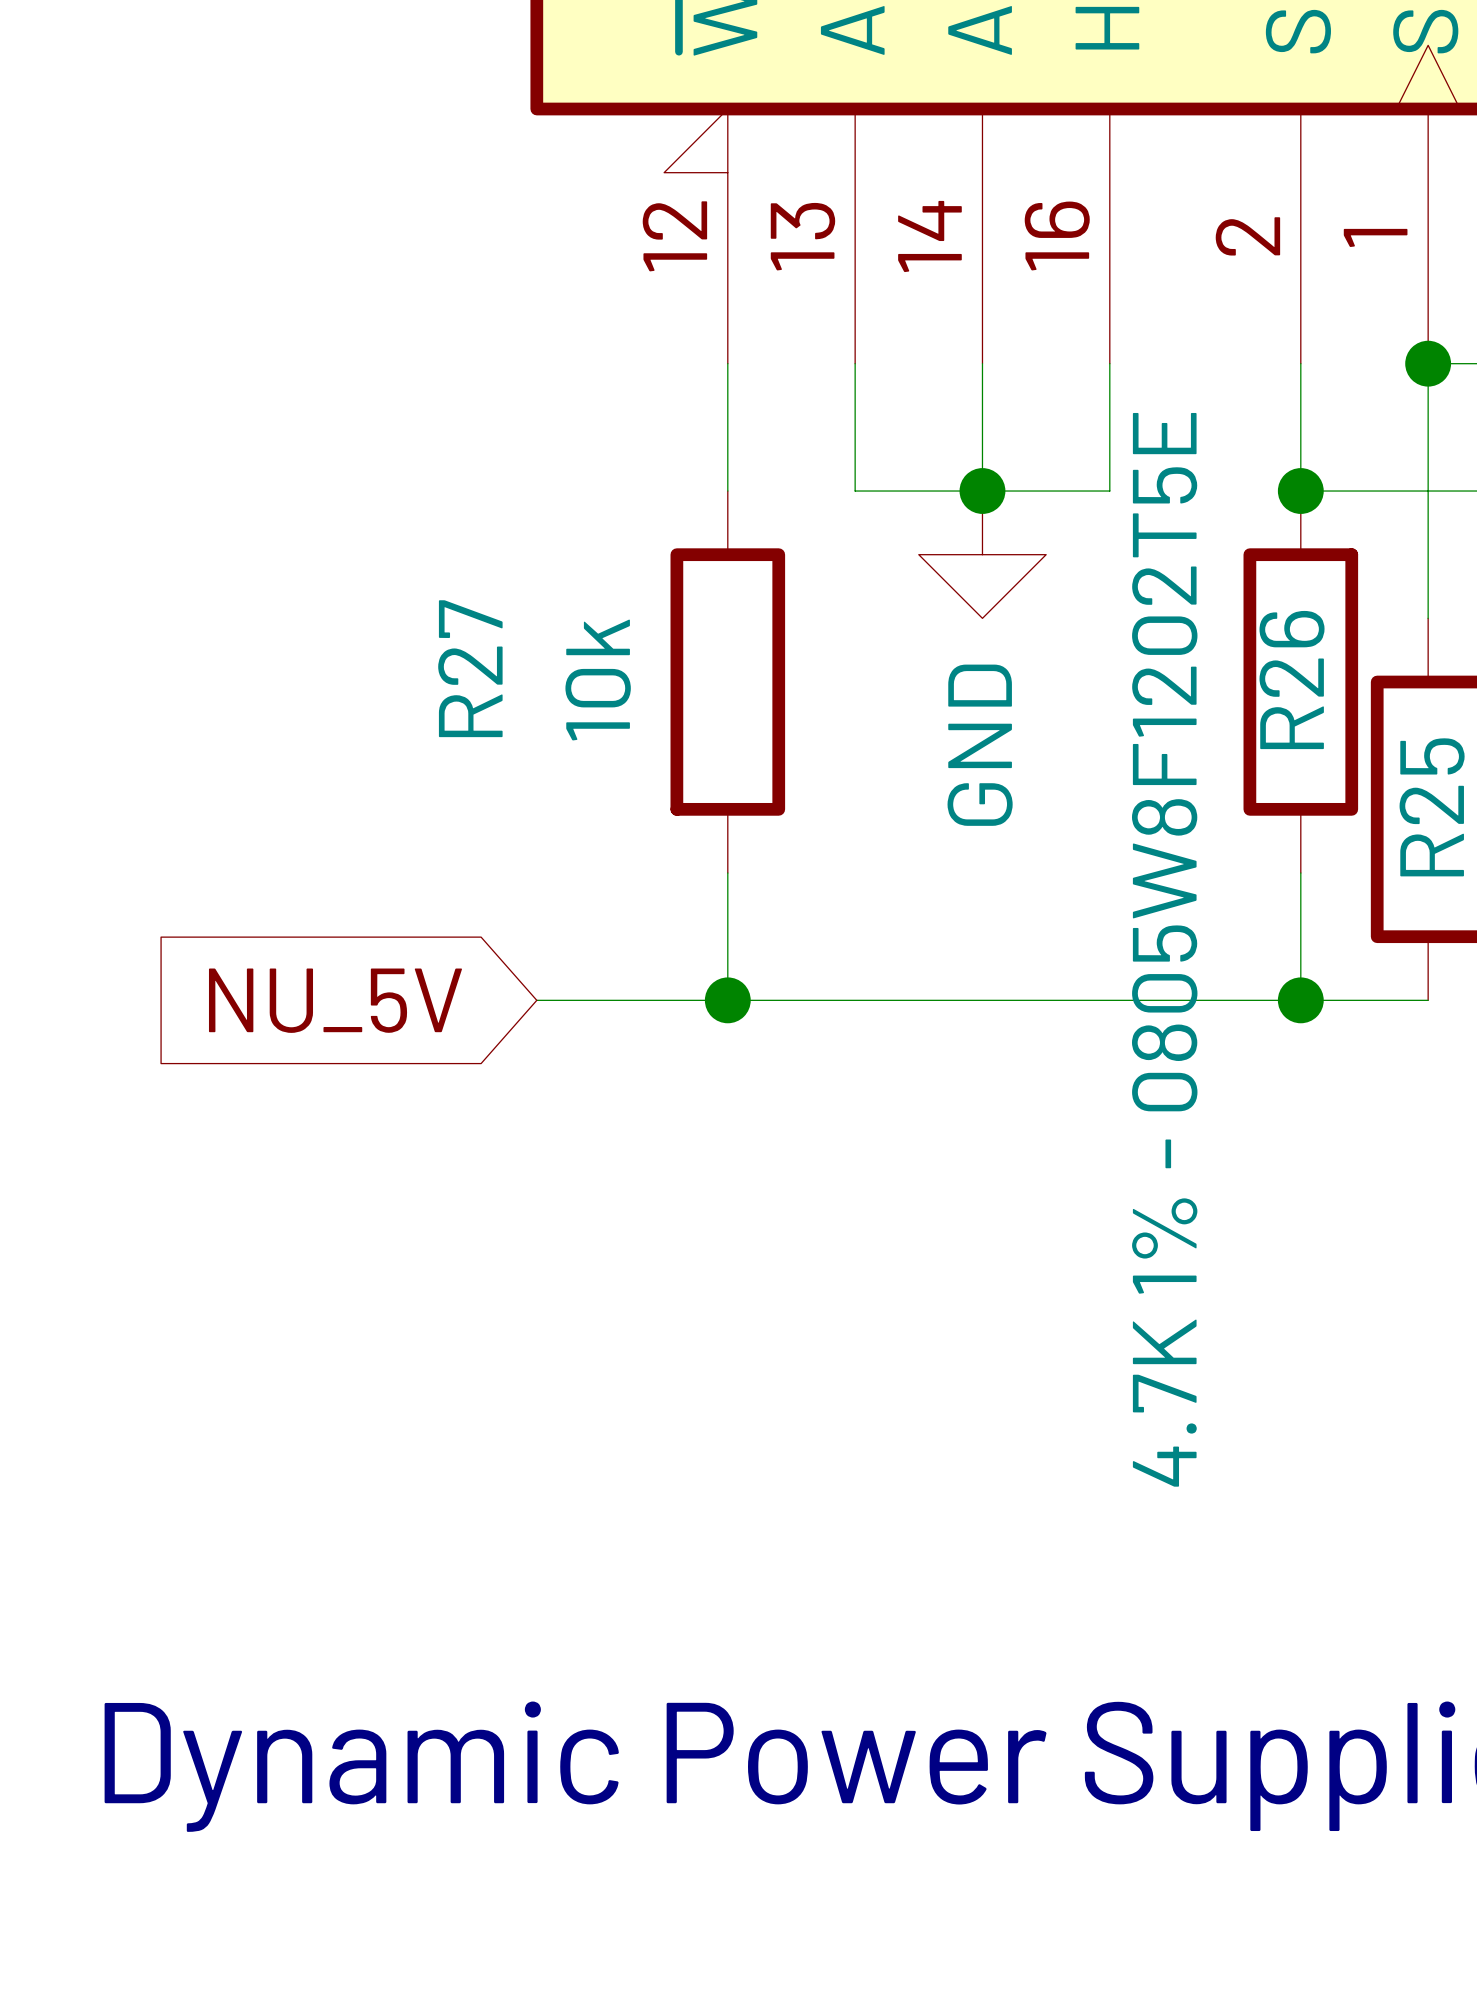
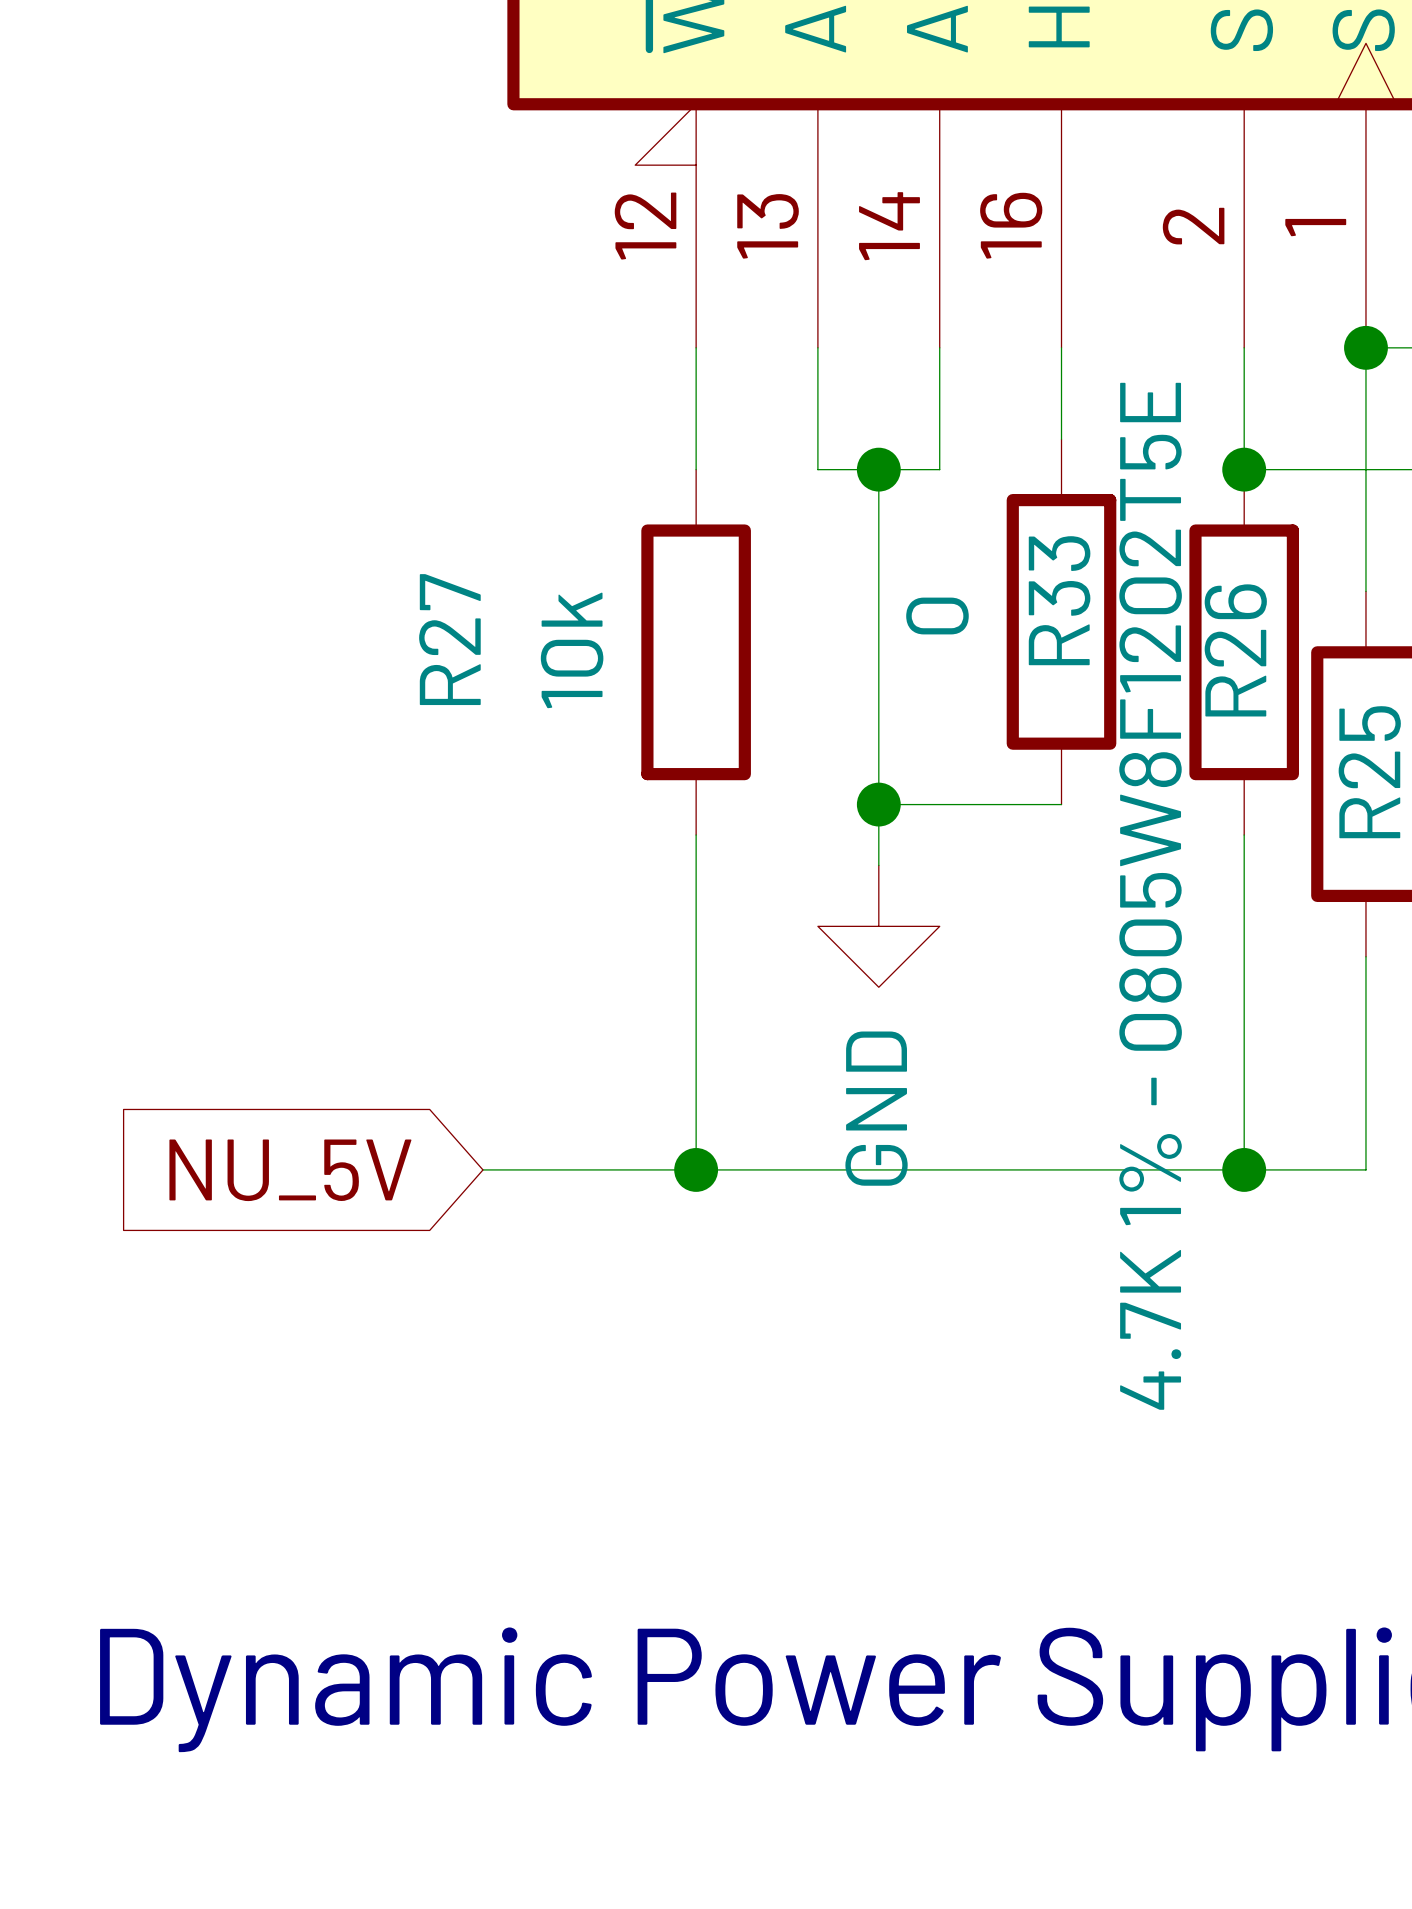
wire: (1109, 459) (1109, 491) (982, 491) -> none
wire: none -> (878, 469) (878, 865)
junction position: (982, 491) -> (878, 469)
power symbol position: GND (982, 554) -> GND (878, 926)
R33: none -> 0 (1061, 621)
wire: none -> (878, 804) (1061, 804)
junction: none -> (878, 804)
R26 value position: 4.7K 1% - 0805W8F1202T5E (1164, 949) -> 4.7K 1% - 0805W8F1202T5E (1150, 896)
global label position: NU_5V (335, 1000) -> NU_5V (290, 1170)
wire: (536, 1000) (1428, 1000) -> (482, 1169) (1365, 1169) (1365, 956)
wire: none -> (696, 956) (696, 1169)
junction: (727, 1000) -> none
wire: none -> (1244, 956) (1244, 1169)
junction: (1300, 1000) -> none
junction: none -> (696, 1169)
junction: none -> (1244, 1169)

